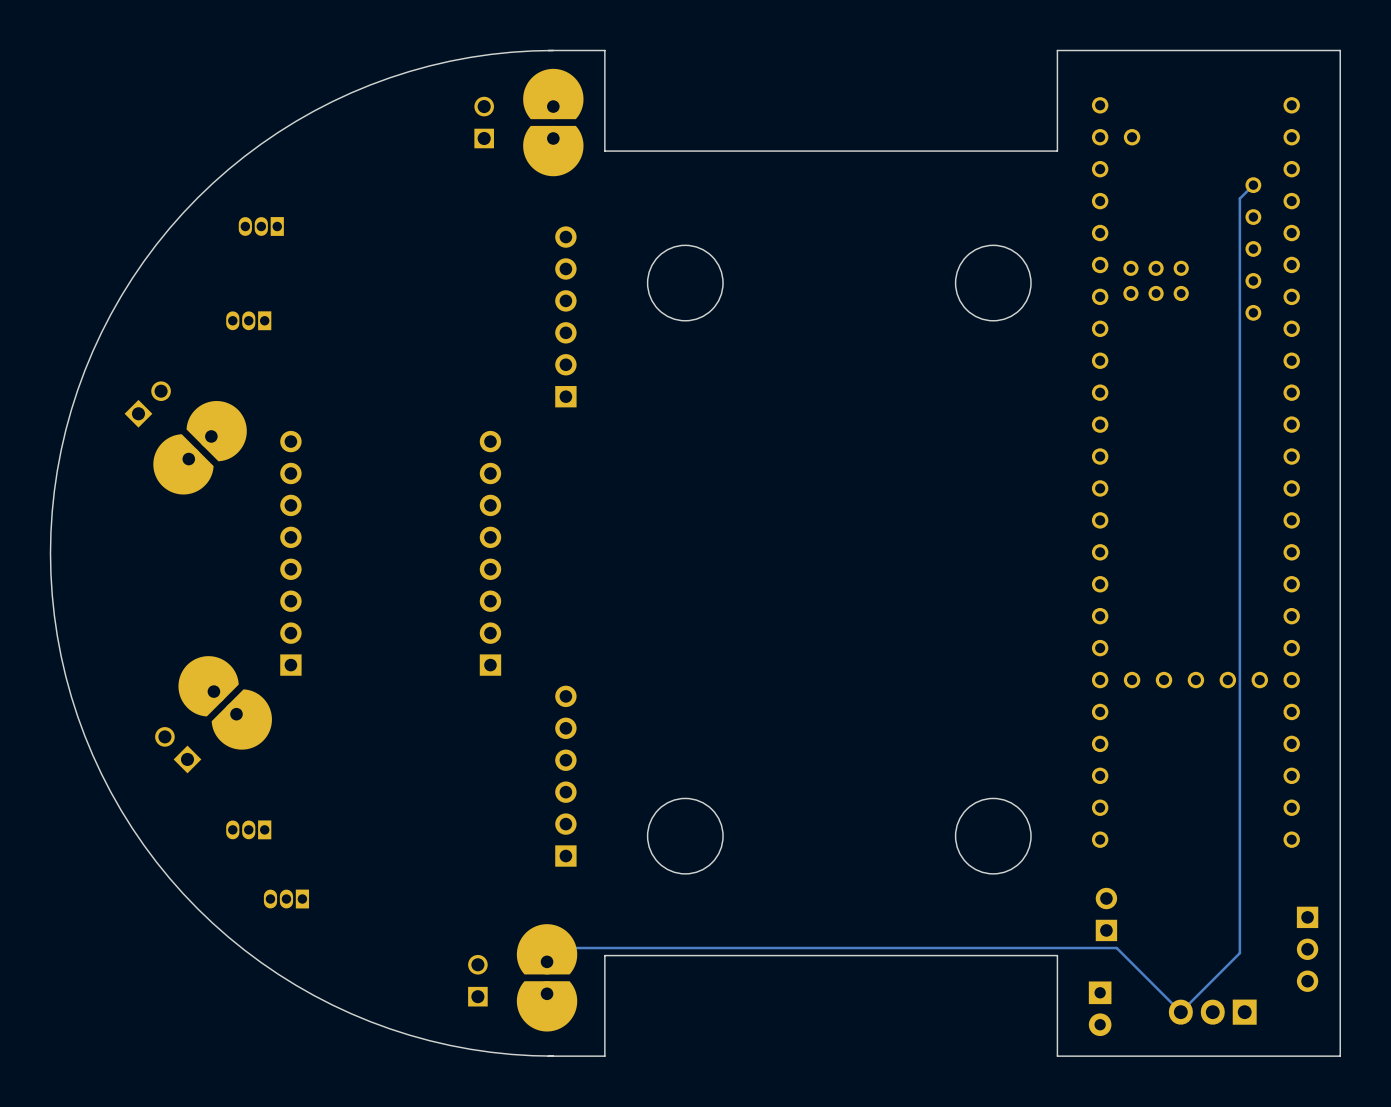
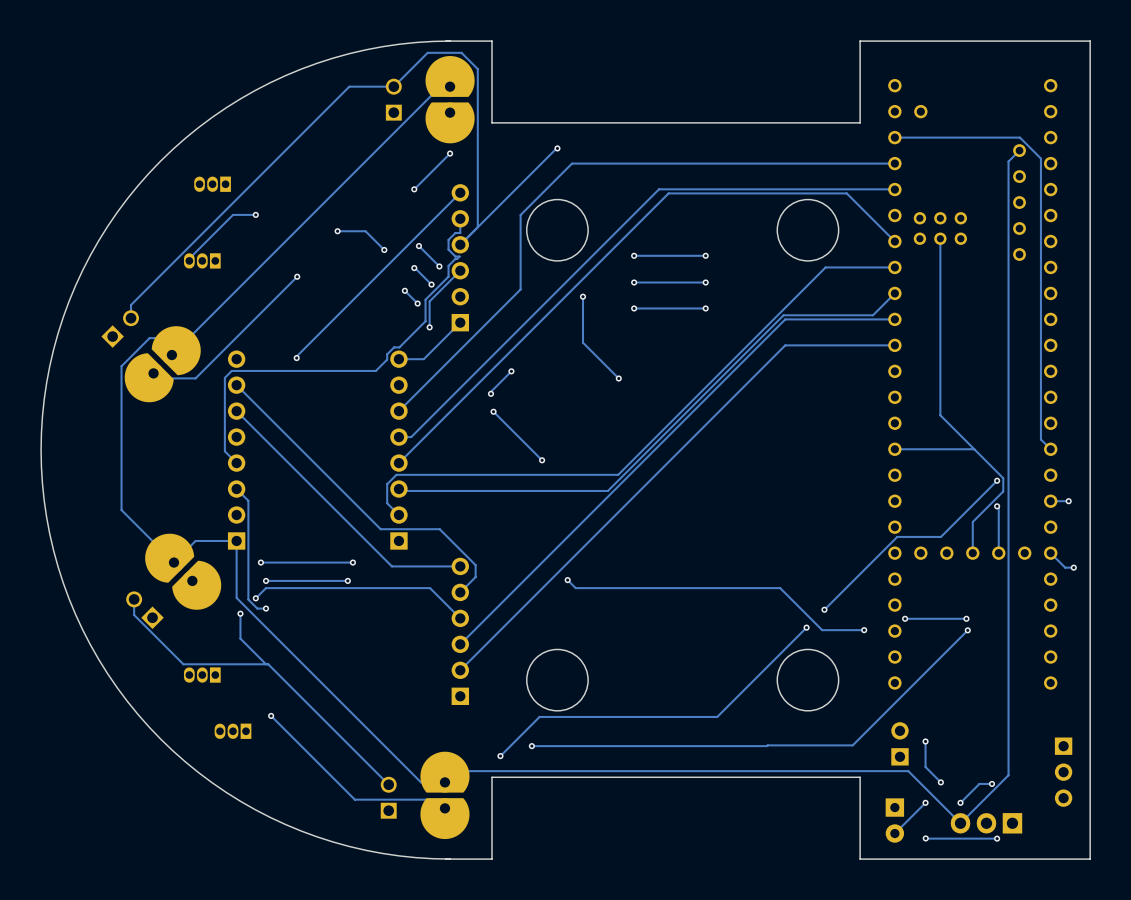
track: none -> (450, 86) (444, 81) (171, 355) (155, 338) (149, 338) (121, 366) (121, 510) (174, 562) (195, 540) (236, 540) (236, 597) (421, 782) (444, 782)
track: none -> (894, 137) (1019, 137) (1040, 158) (1040, 439) (1050, 449)
track: none -> (557, 148) (460, 244)
via: none -> (557, 148)
track: none -> (450, 153) (414, 189)
via: none -> (450, 153)
track: none -> (894, 163) (572, 163) (520, 214) (520, 289) (398, 411)
via: none -> (414, 189)
track: none -> (894, 189) (659, 189) (411, 437) (398, 437)
track: none -> (460, 192) (296, 358)
track: none -> (255, 214) (233, 214) (189, 258) (189, 260)
via: none -> (255, 214)
track: none -> (460, 218) (460, 232) (455, 232) (448, 239) (448, 249) (455, 256) (459, 256) (448, 265) (448, 276) (425, 299) (425, 321) (399, 347) (394, 347) (387, 354) (387, 359) (375, 370) (231, 370) (224, 377) (224, 451) (236, 463)
track: none -> (477, 227) (477, 69) (461, 52) (427, 52) (393, 86) (349, 86) (131, 304) (131, 318)
track: none -> (337, 231) (365, 231) (384, 249)
via: none -> (337, 231)
track: none -> (940, 238) (940, 415) (1003, 478) (1003, 491) (972, 521) (972, 553)
track: none -> (894, 241) (846, 193) (668, 193) (398, 463)
track: none -> (418, 246) (439, 266)
via: none -> (418, 246)
via: none -> (384, 249)
via: none -> (634, 255)
track: none -> (705, 255) (634, 255)
via: none -> (705, 255)
via: none -> (439, 266)
track: none -> (894, 267) (825, 267) (618, 474) (396, 474) (387, 484) (387, 503) (398, 515)
track: none -> (414, 268) (431, 284)
via: none -> (414, 268)
track: none -> (460, 270) (429, 301) (429, 327)
track: none -> (297, 276) (195, 378) (158, 378) (153, 373)
via: none -> (297, 276)
via: none -> (634, 282)
track: none -> (705, 282) (634, 282)
via: none -> (705, 282)
via: none -> (431, 284)
track: none -> (404, 290) (417, 303)
via: none -> (404, 290)
track: none -> (894, 293) (873, 315) (783, 315) (607, 490) (400, 490) (398, 489)
track: none -> (583, 296) (583, 342) (618, 378)
via: none -> (583, 296)
via: none -> (417, 303)
via: none -> (634, 308)
track: none -> (705, 308) (634, 308)
via: none -> (705, 308)
track: none -> (894, 319) (785, 319) (460, 644)
track: none -> (460, 322) (423, 359) (398, 359)
via: none -> (429, 327)
track: none -> (894, 345) (785, 345) (460, 670)
via: none -> (296, 358)
track: none -> (511, 371) (490, 393)
via: none -> (511, 371)
via: none -> (618, 378)
track: none -> (236, 385) (380, 529) (439, 529) (475, 565) (475, 577) (460, 592)
via: none -> (490, 393)
track: none -> (236, 411) (391, 566) (460, 566)
track: none -> (493, 411) (542, 460)
via: none -> (493, 411)
track: none -> (974, 449) (894, 449)
via: none -> (542, 460)
track: none -> (997, 480) (940, 536) (897, 536) (824, 609)
via: none -> (997, 480)
track: none -> (236, 489) (248, 500) (248, 599) (257, 608) (266, 608)
track: none -> (1068, 501) (1050, 501)
via: none -> (1068, 501)
track: none -> (997, 506) (998, 507) (998, 553)
via: none -> (997, 506)
track: none -> (1050, 553) (1065, 567) (1073, 567)
via: none -> (260, 562)
track: none -> (352, 562) (260, 562)
via: none -> (352, 562)
via: none -> (1073, 567)
track: none -> (567, 580) (575, 588) (780, 588) (822, 630) (865, 630)
via: none -> (567, 580)
via: none -> (266, 580)
track: none -> (347, 580) (266, 580)
via: none -> (347, 580)
track: none -> (255, 598) (266, 588) (430, 588) (460, 618)
via: none -> (255, 598)
track: none -> (134, 599) (134, 615) (183, 664) (268, 664) (388, 784)
via: none -> (266, 608)
via: none -> (824, 609)
track: none -> (240, 613) (240, 638) (266, 664)
via: none -> (240, 613)
via: none -> (905, 618)
track: none -> (966, 618) (905, 618)
via: none -> (966, 618)
track: none -> (806, 627) (717, 716) (539, 716) (500, 756)
via: none -> (806, 627)
via: none -> (864, 630)
track: none -> (967, 630) (852, 745) (531, 746)
via: none -> (967, 630)
track: none -> (271, 715) (354, 799) (436, 799) (444, 808)
via: none -> (271, 715)
track: none -> (925, 741) (925, 767) (940, 782)
via: none -> (925, 741)
via: none -> (531, 746)
via: none -> (500, 756)
via: none -> (940, 782)
track: none -> (992, 783) (979, 783) (960, 802)
via: none -> (992, 783)
track: none -> (925, 802) (894, 833)
via: none -> (925, 802)
via: none -> (960, 802)
track: none -> (925, 838) (997, 838)
via: none -> (925, 838)
via: none -> (997, 838)

